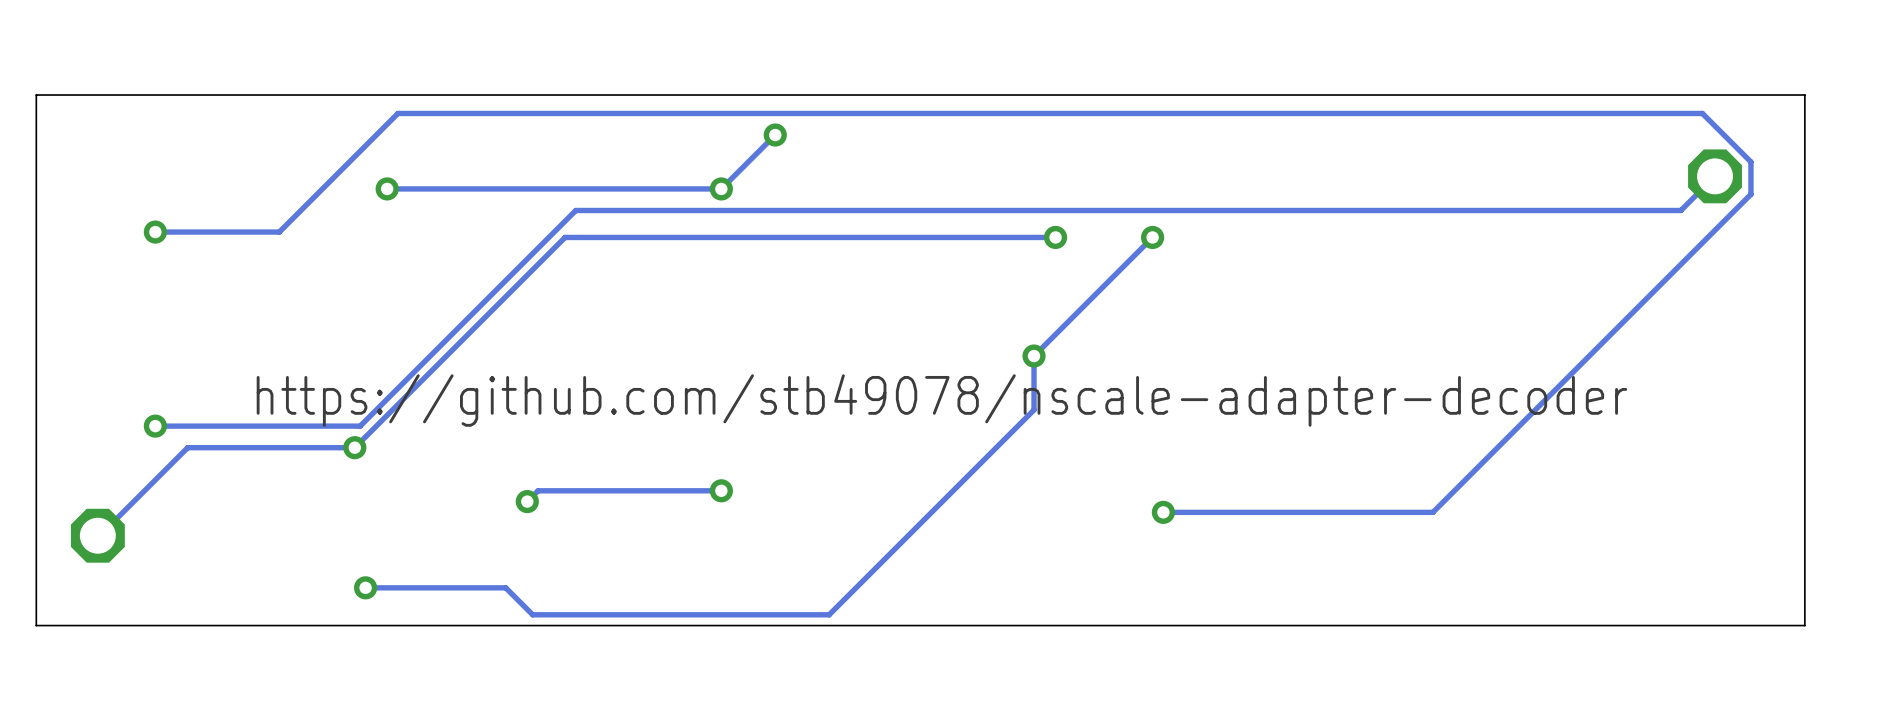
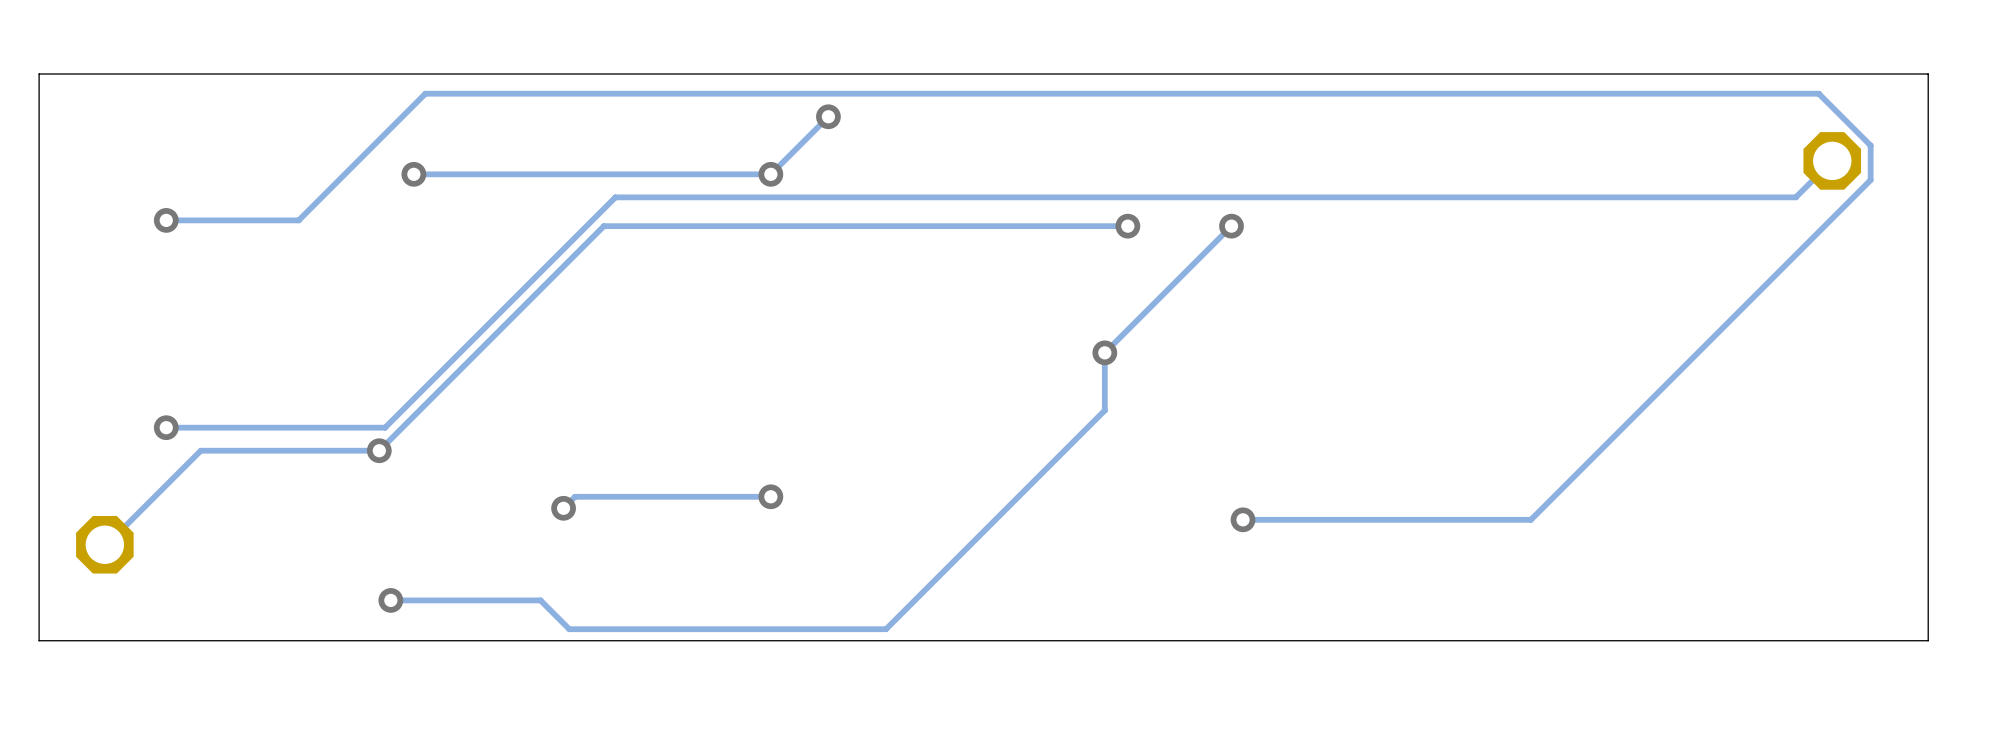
text: https://github.com/stb49078/nscale-adapter-decoder (941, 400) -> none

